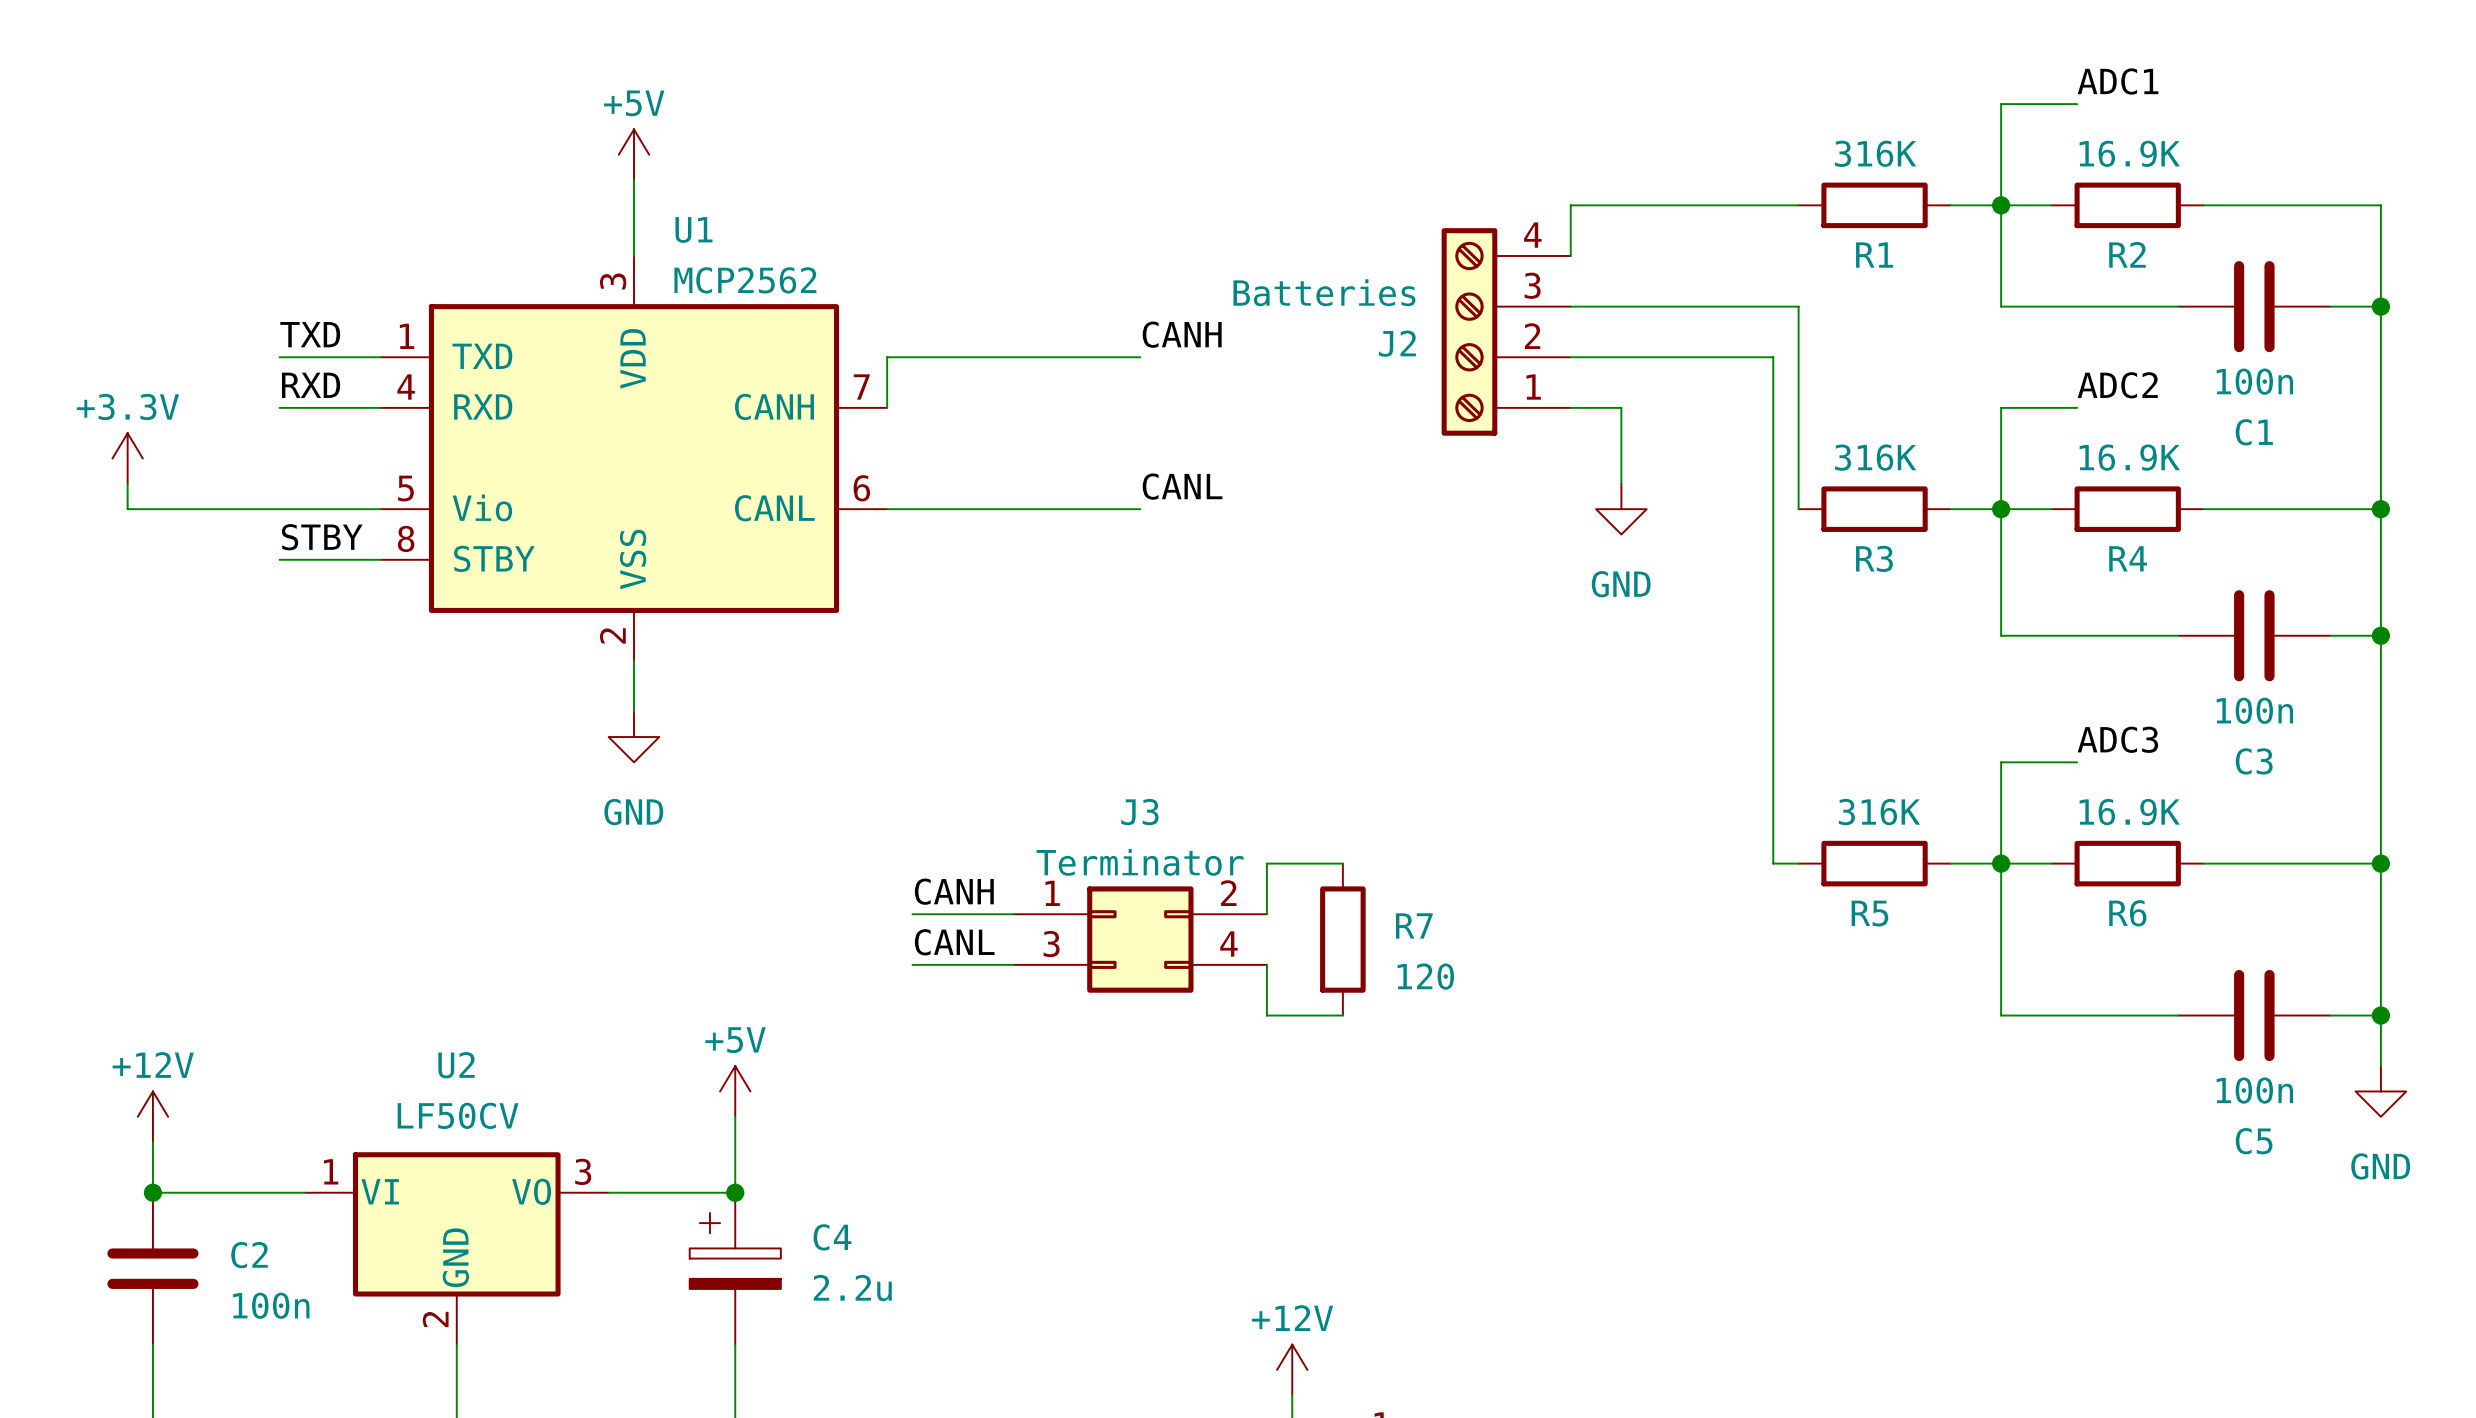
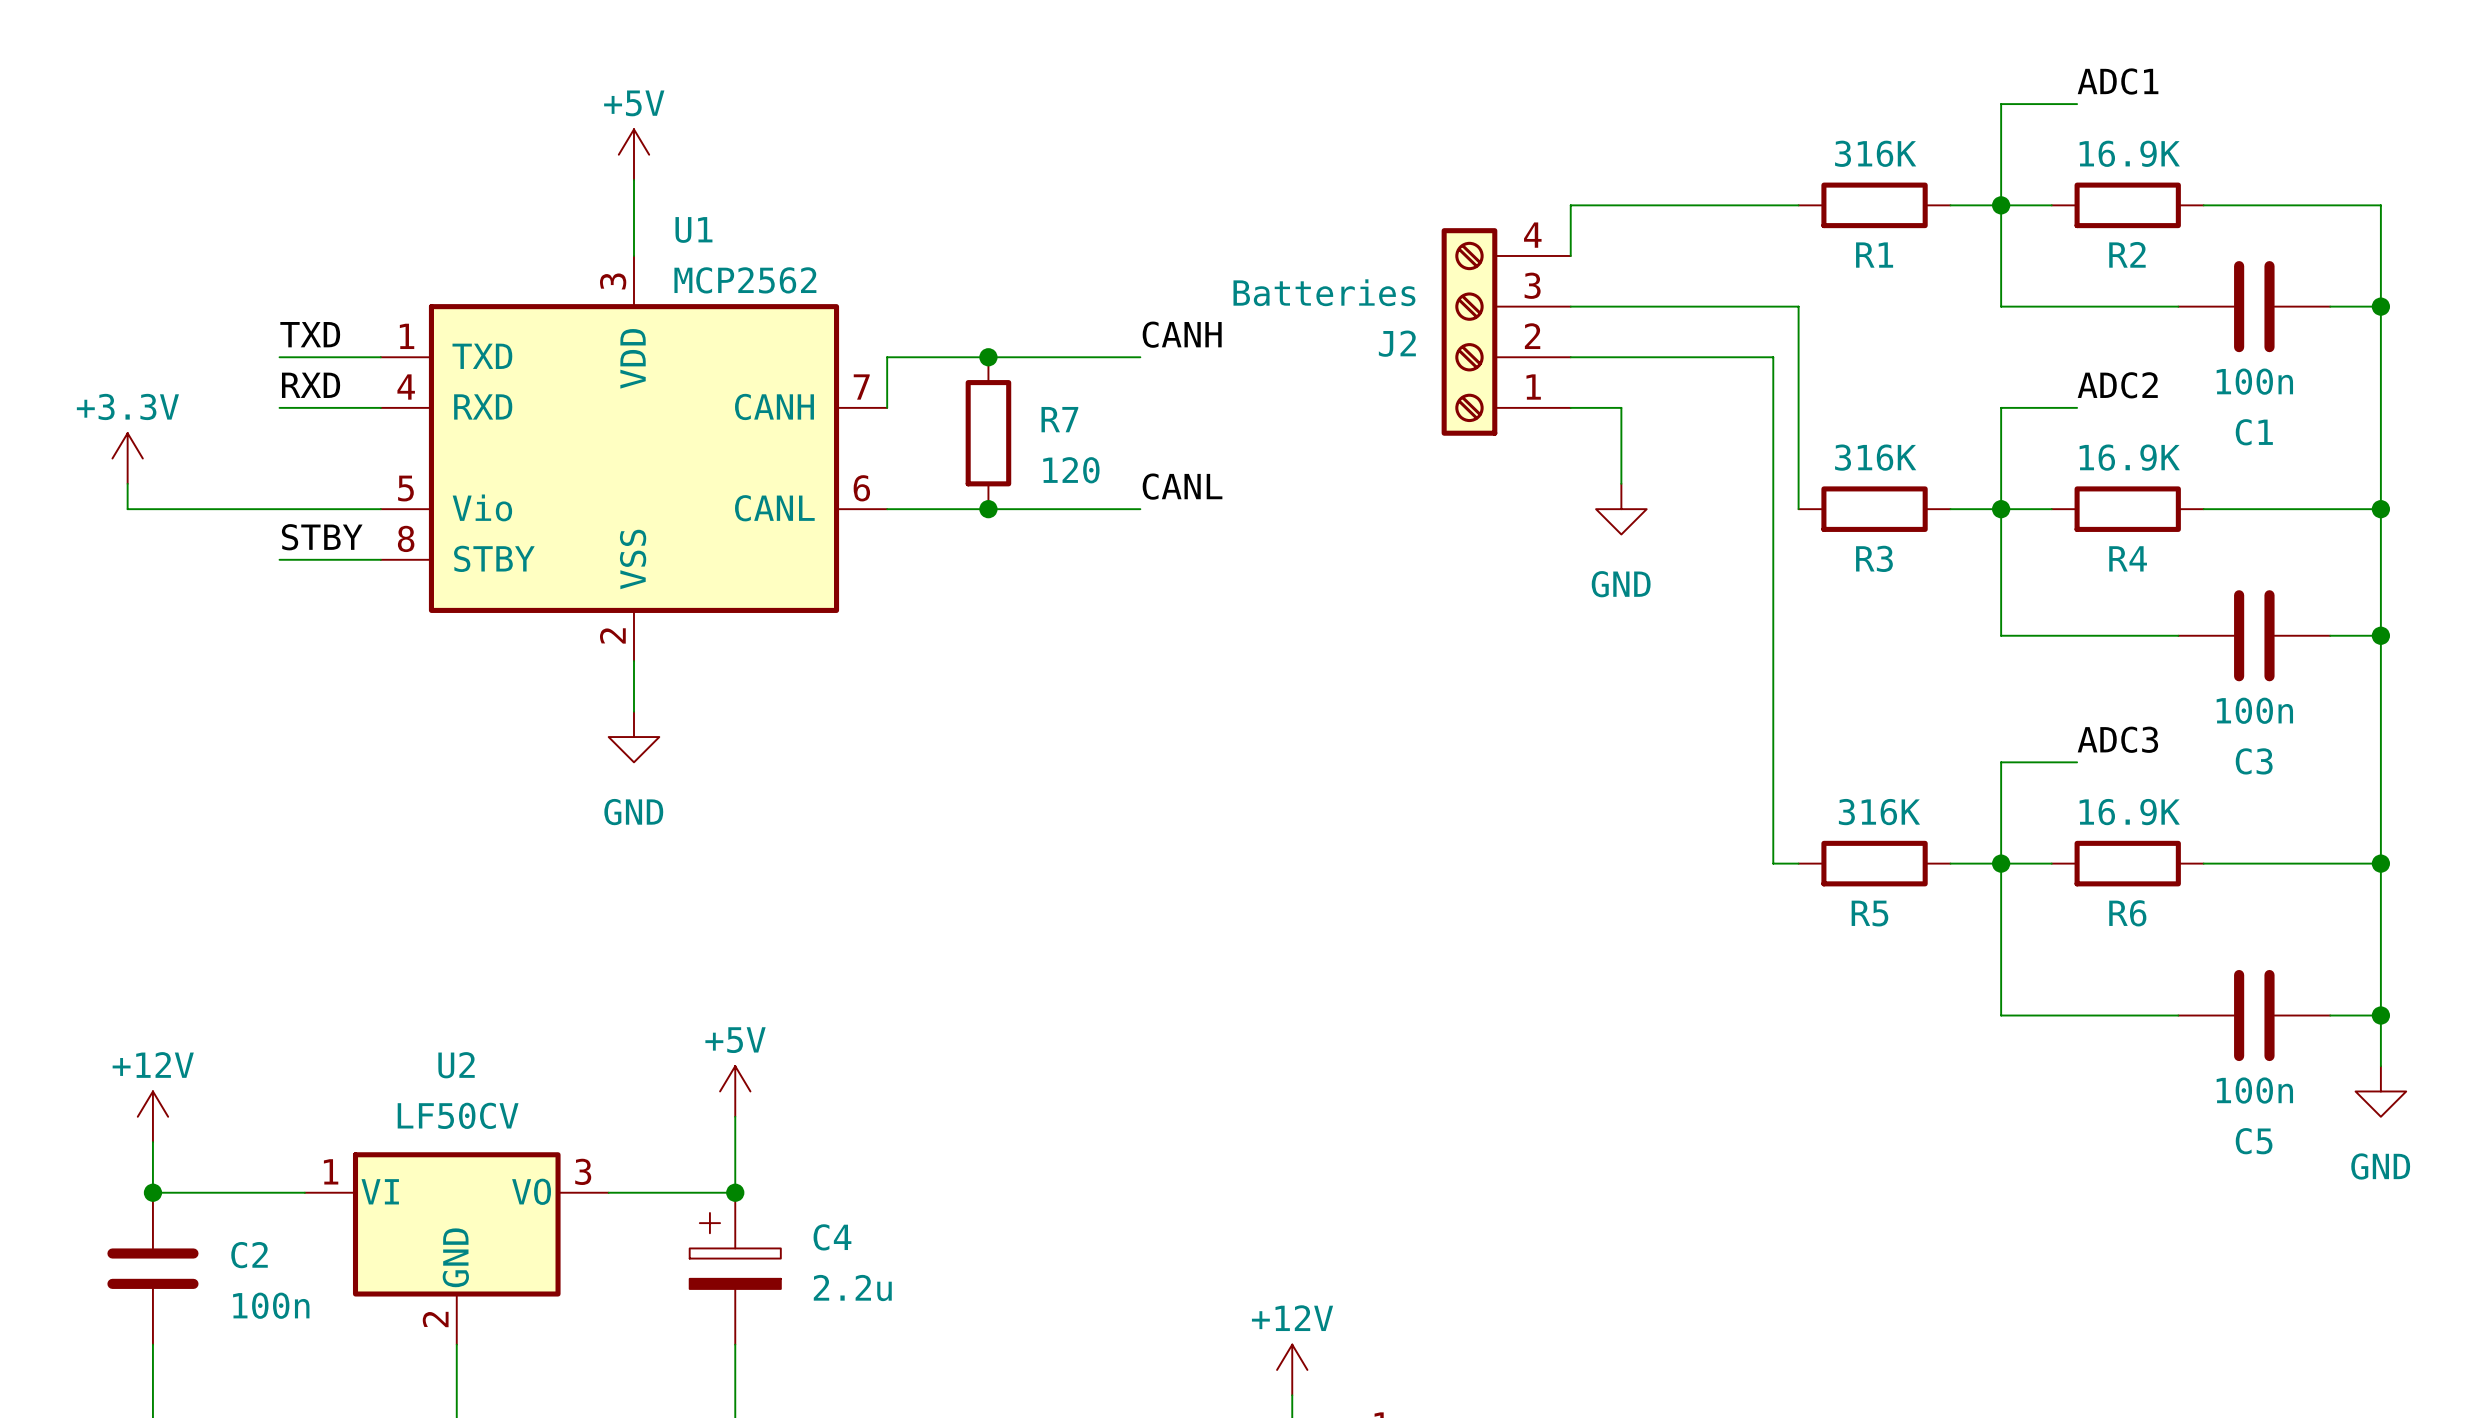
junction: none -> (988, 357)
junction: none -> (988, 509)
wire: (1342, 863) (1266, 863) (1266, 914) -> none
label: CANH (954, 891) -> none
wire: (912, 914) (1013, 914) -> none
J3: Terminator (1140, 939) -> none
R7 position: (1342, 939) -> (988, 433)
label: CANL (954, 942) -> none
wire: (912, 964) (1013, 964) -> none
wire: (1266, 964) (1266, 1015) (1342, 1015) -> none

